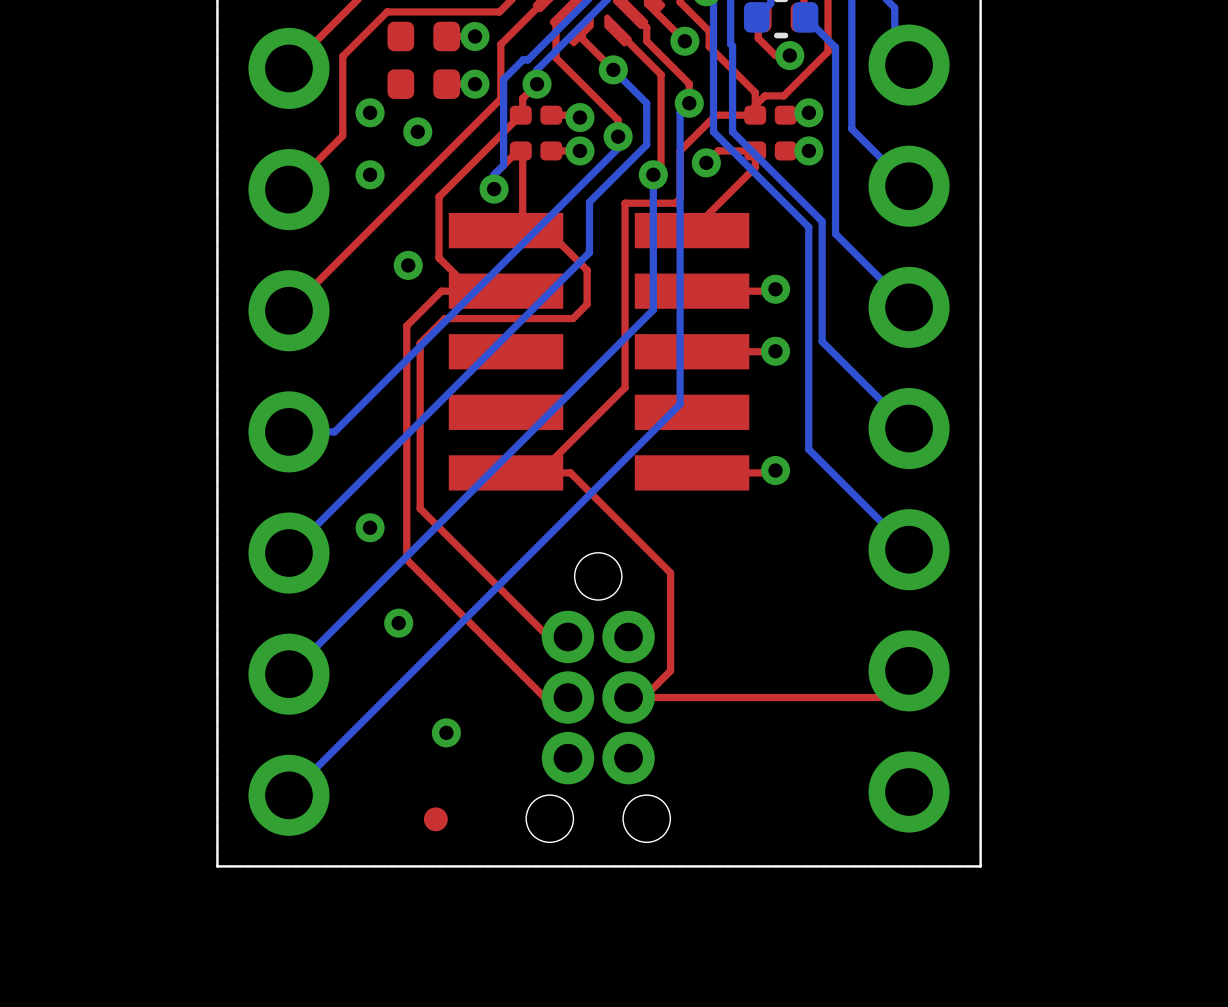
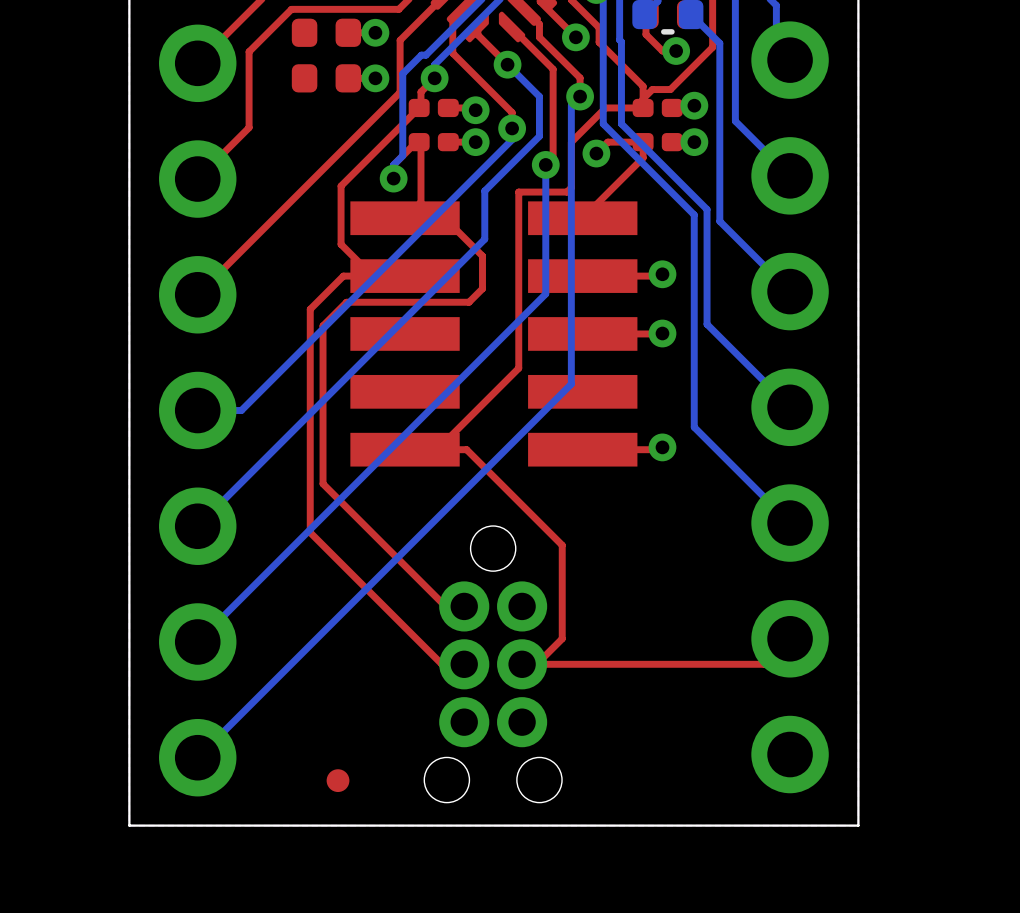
via: (370, 112) -> none
via: (417, 131) -> none
via: (370, 174) -> none
via: (408, 265) -> none
via: (370, 527) -> none
via: (398, 623) -> none
via: (446, 732) -> none

